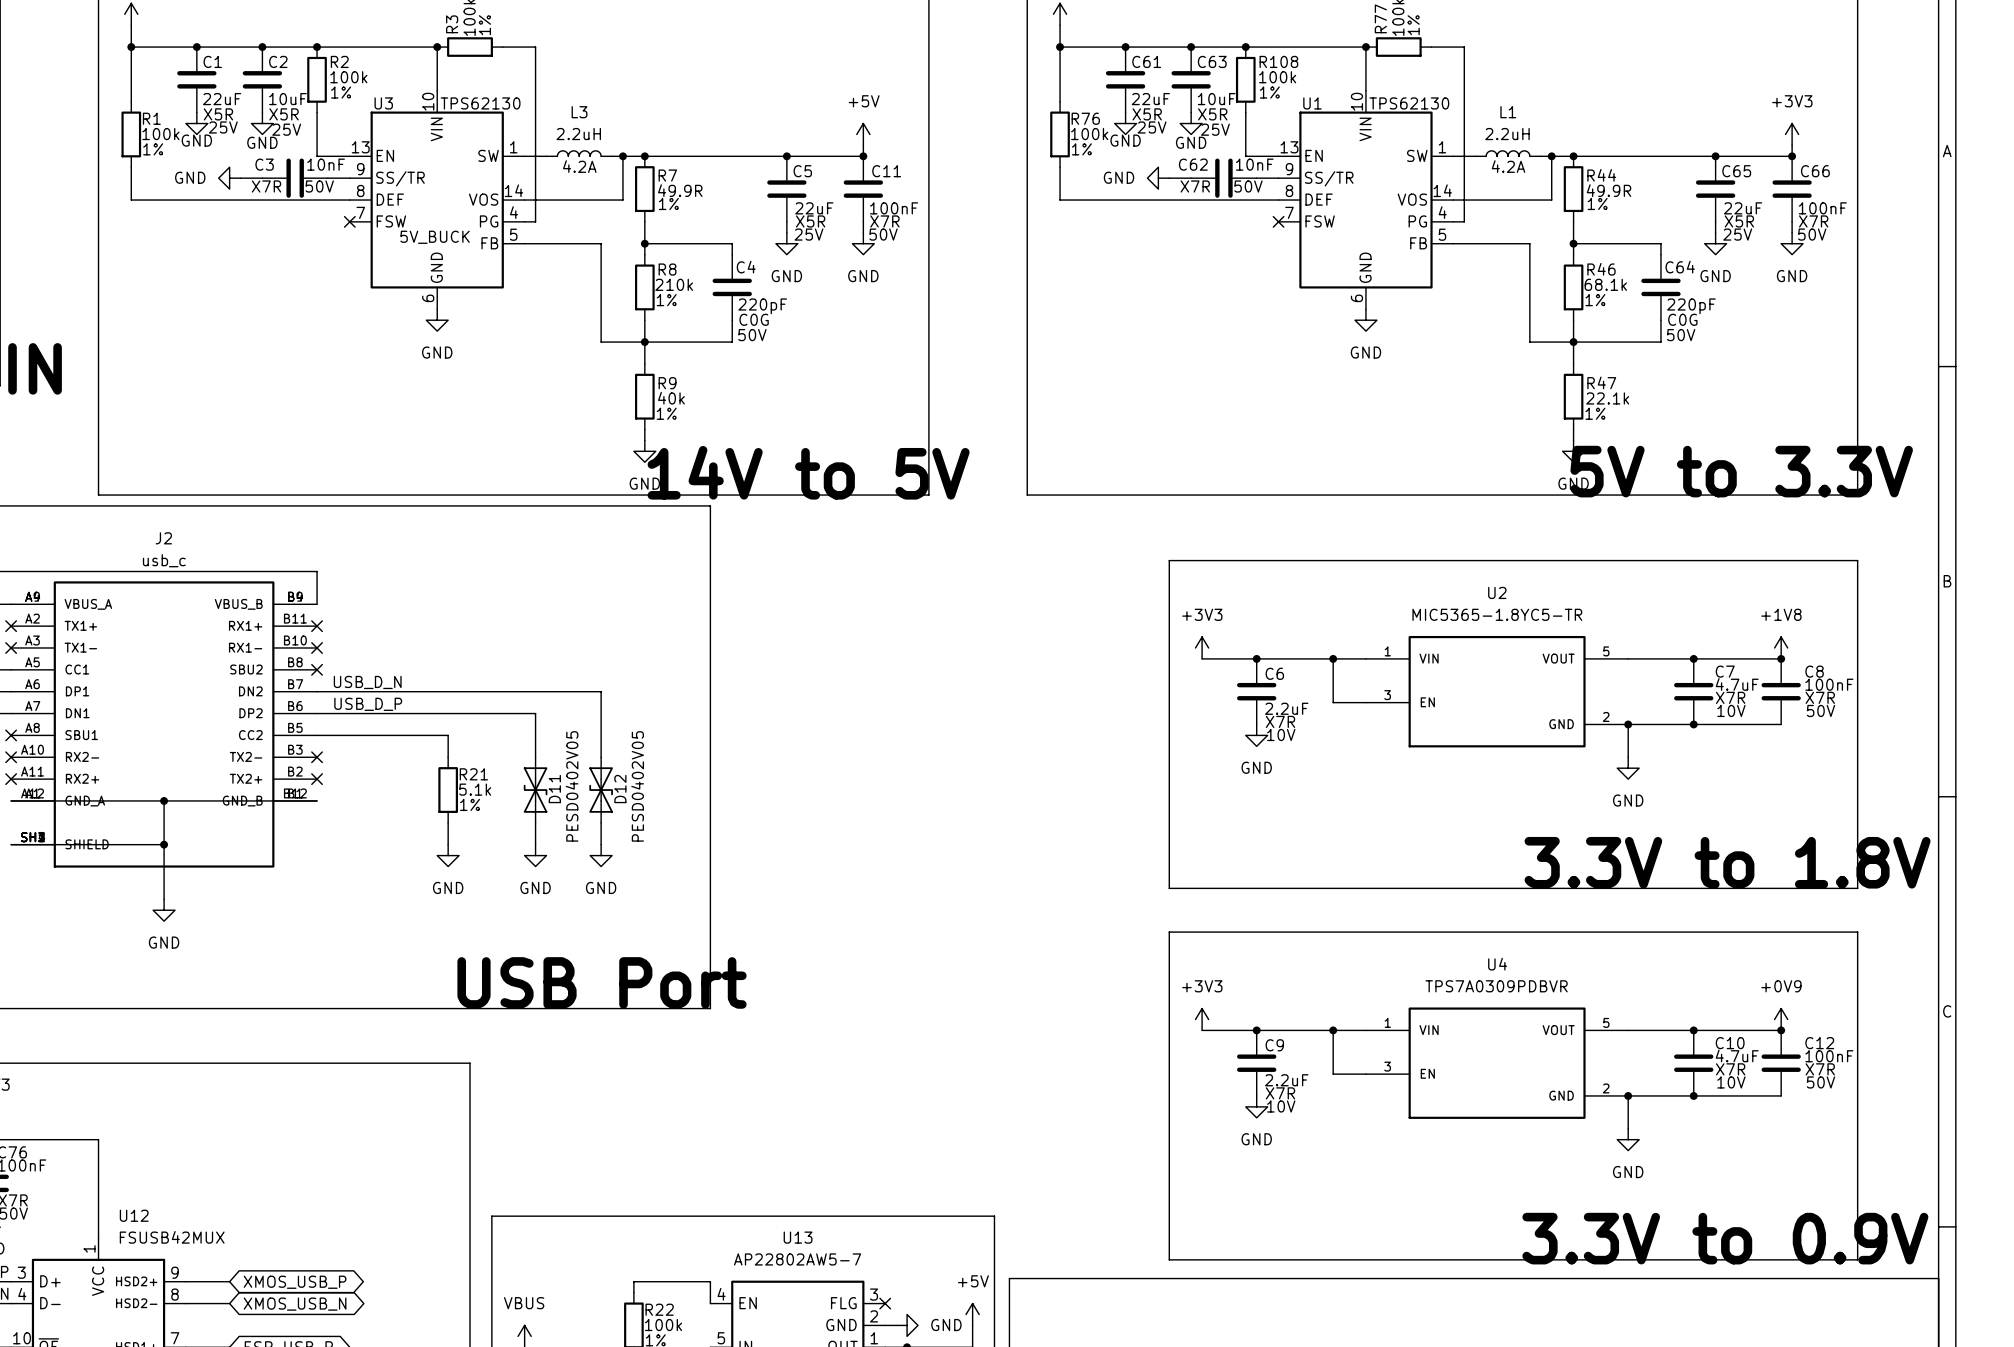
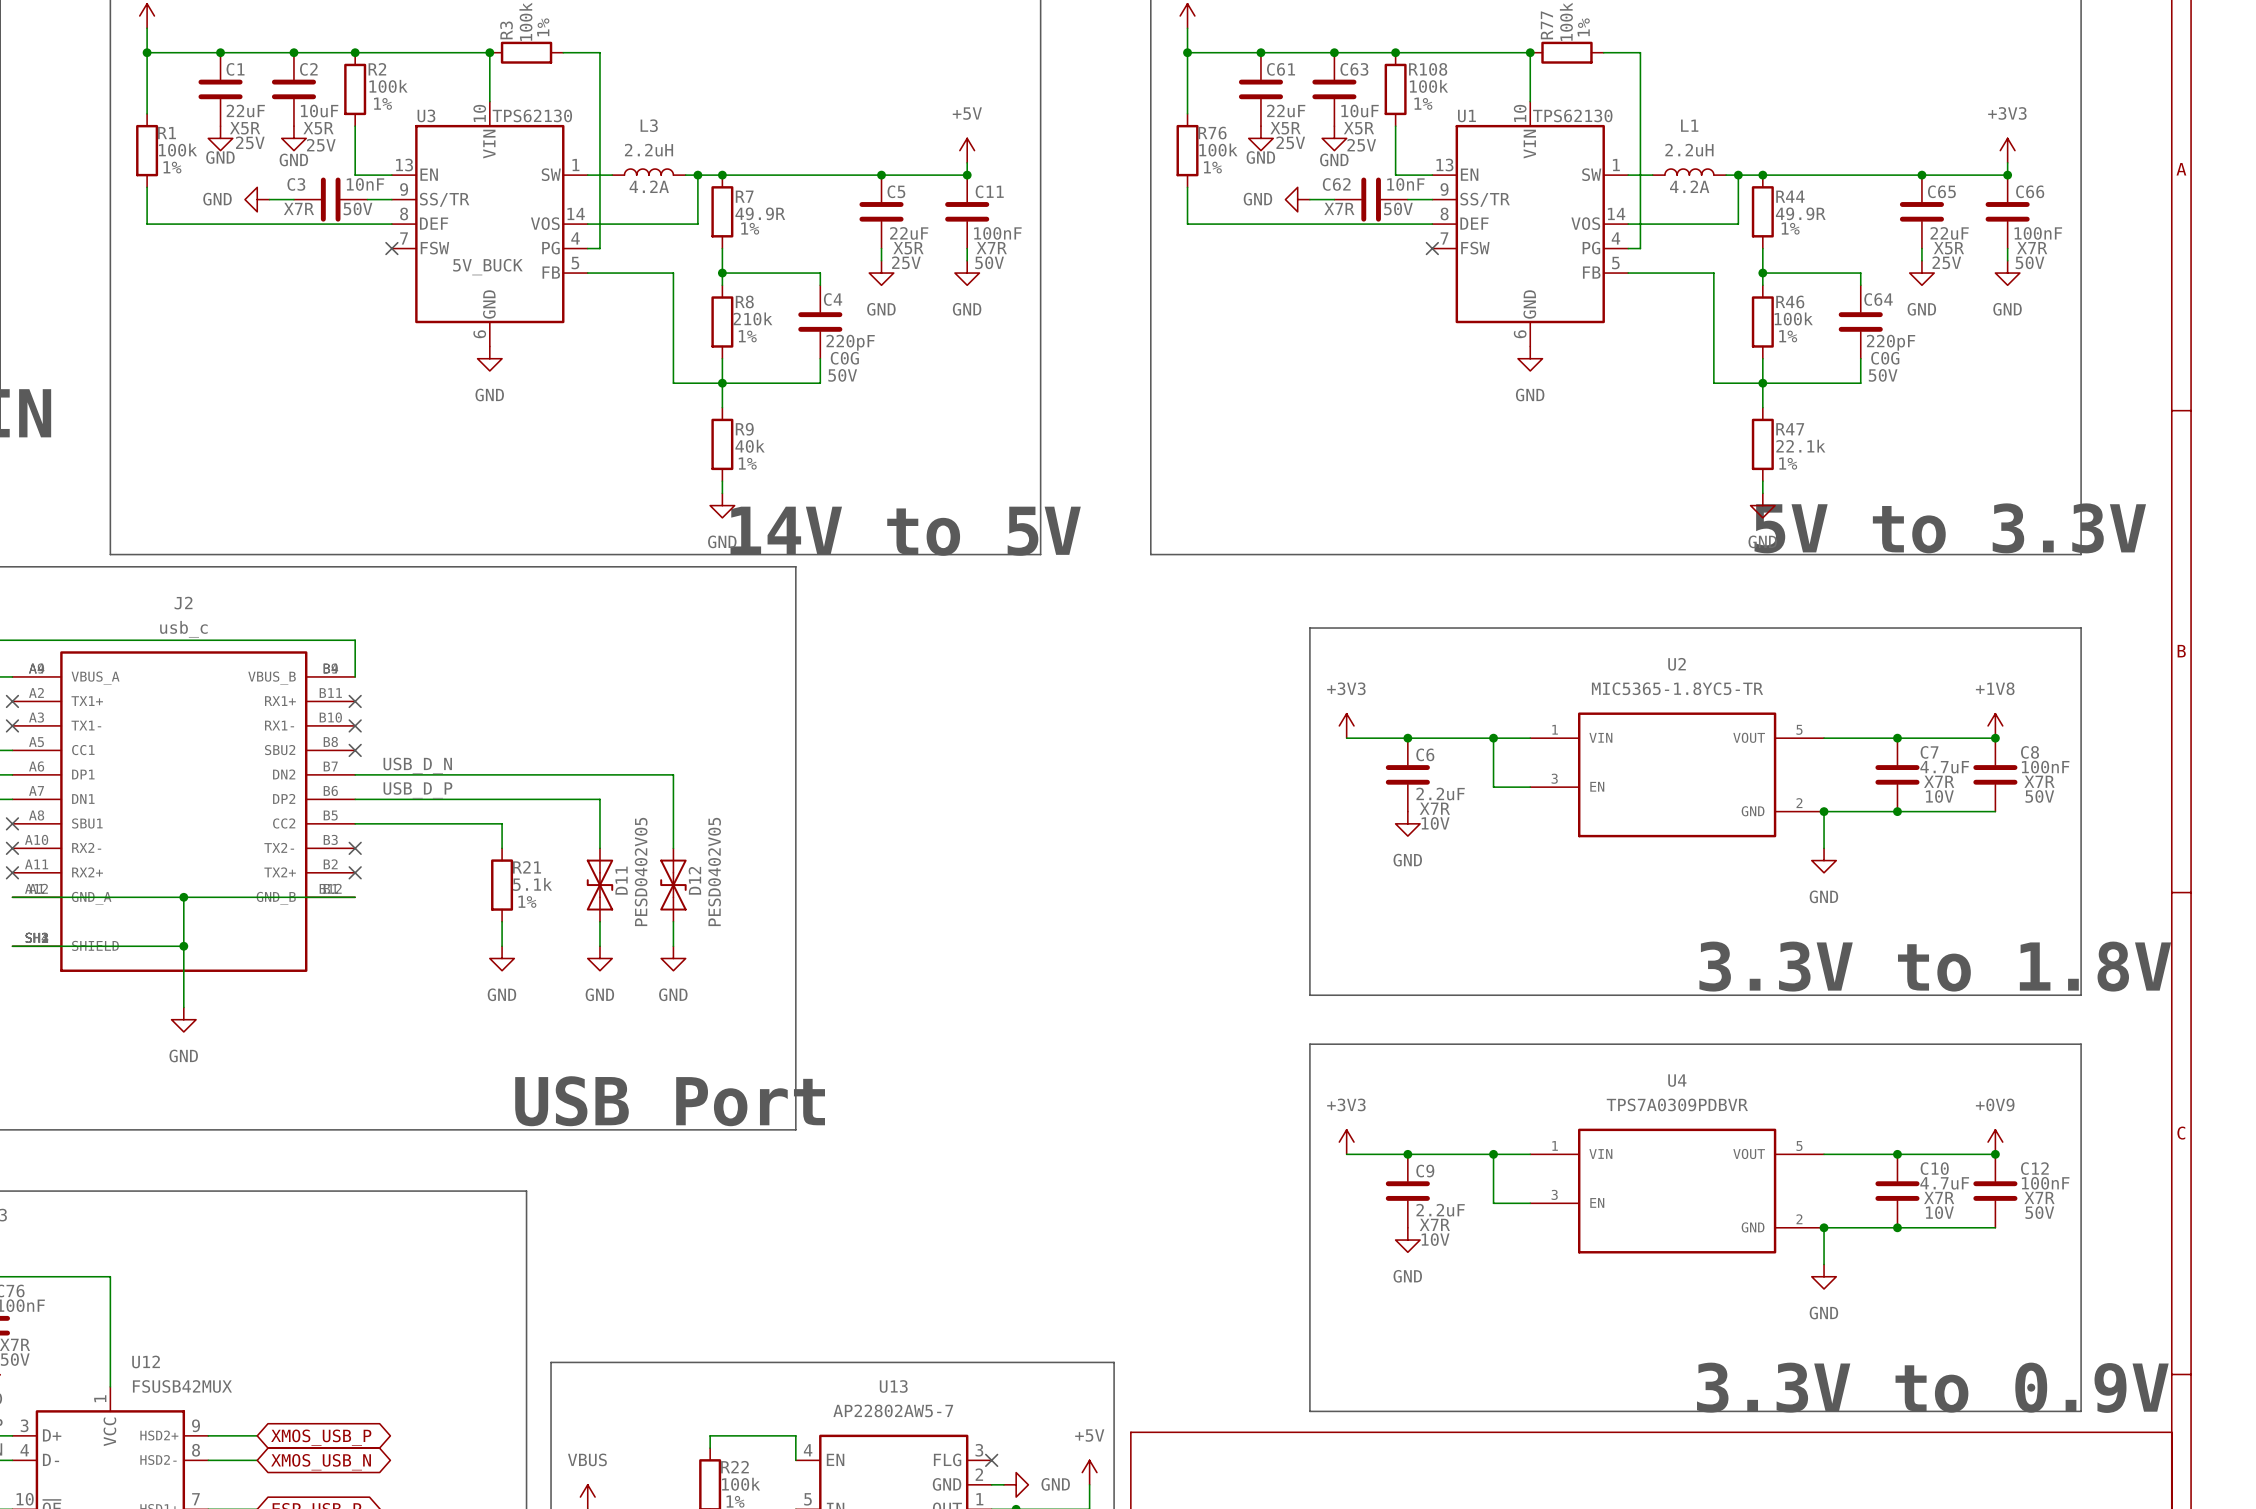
R46 value: 68.1k (1605, 284) -> 100k (1793, 318)

